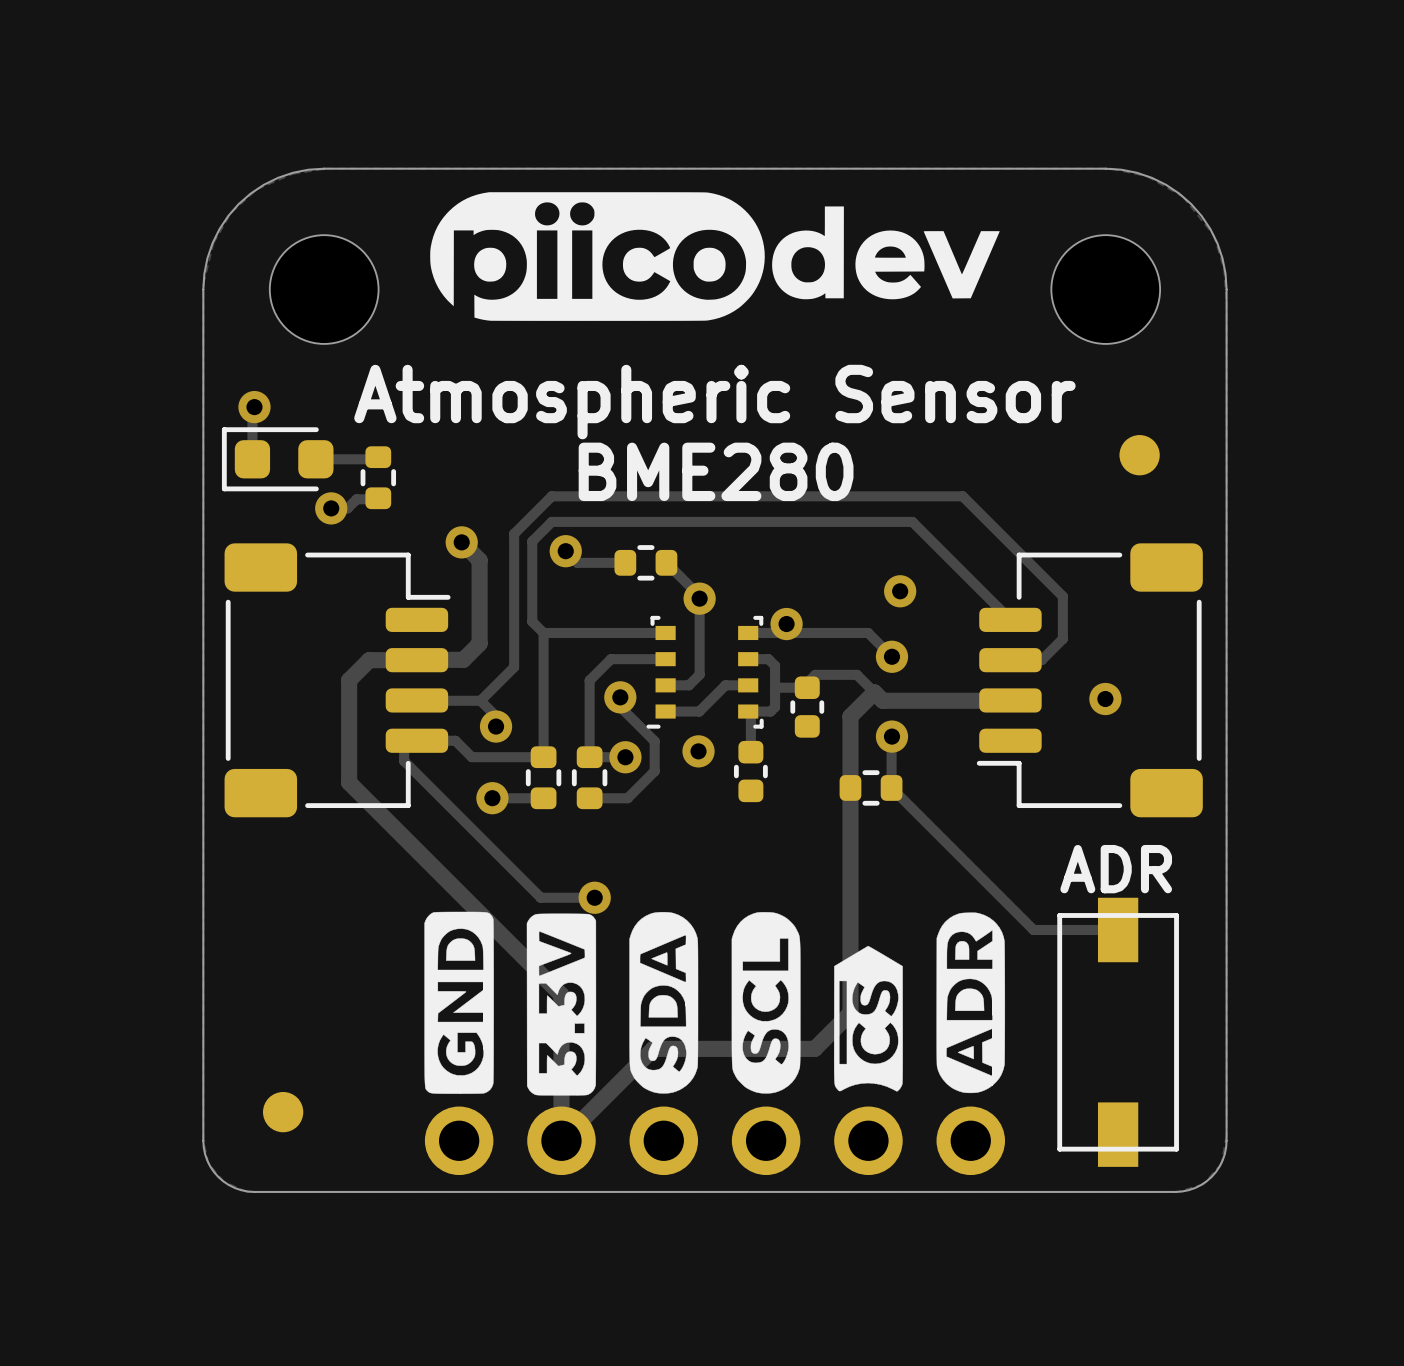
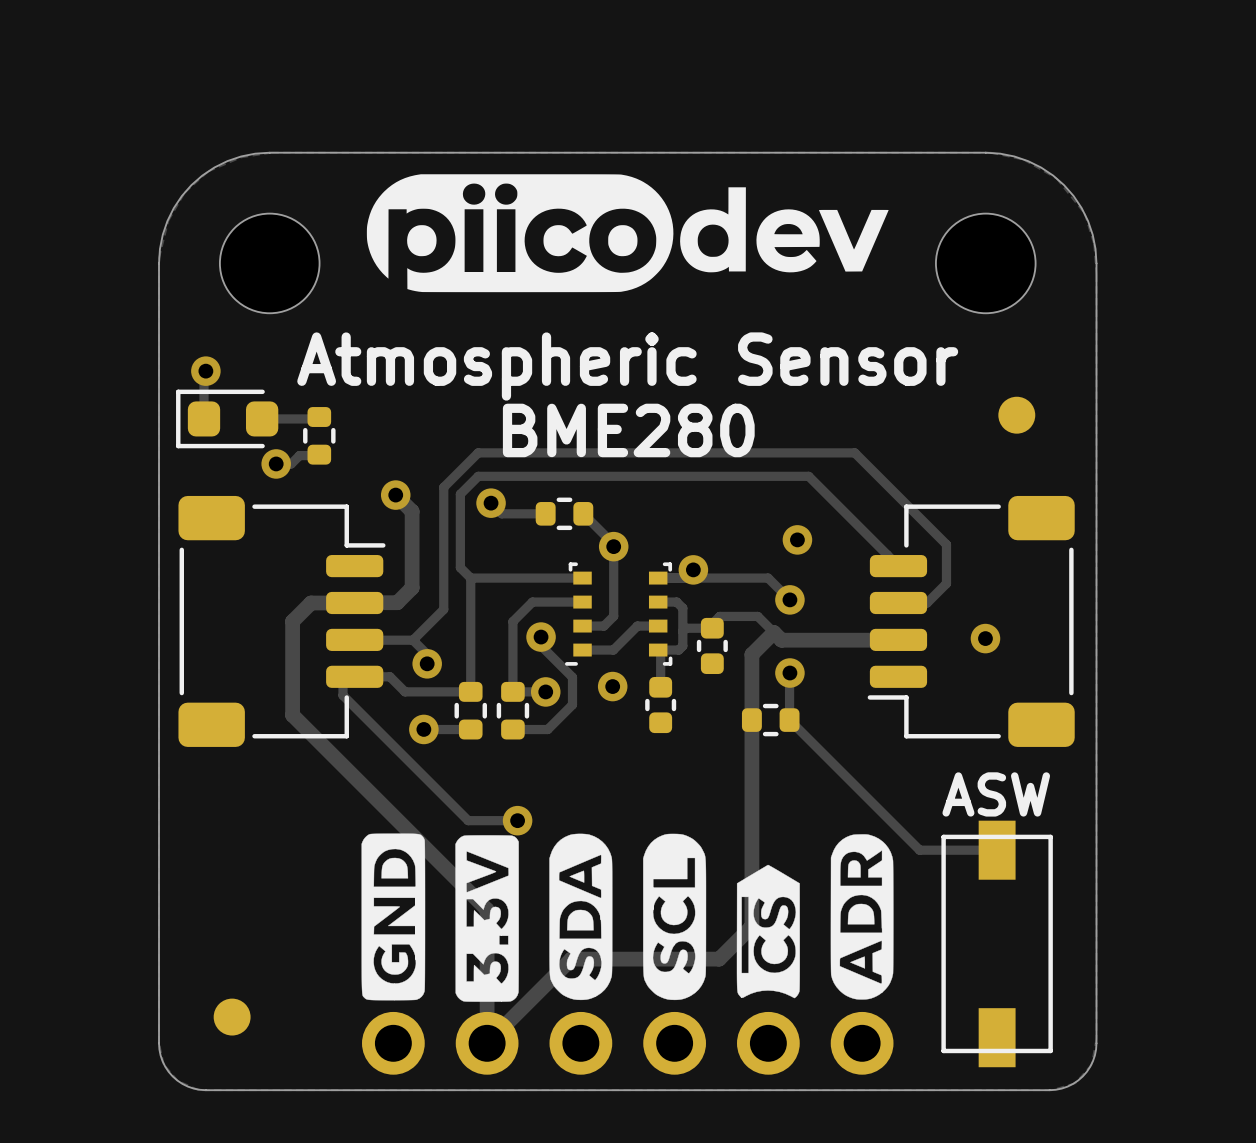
text: ADR (1116, 869) -> ASW (996, 794)

